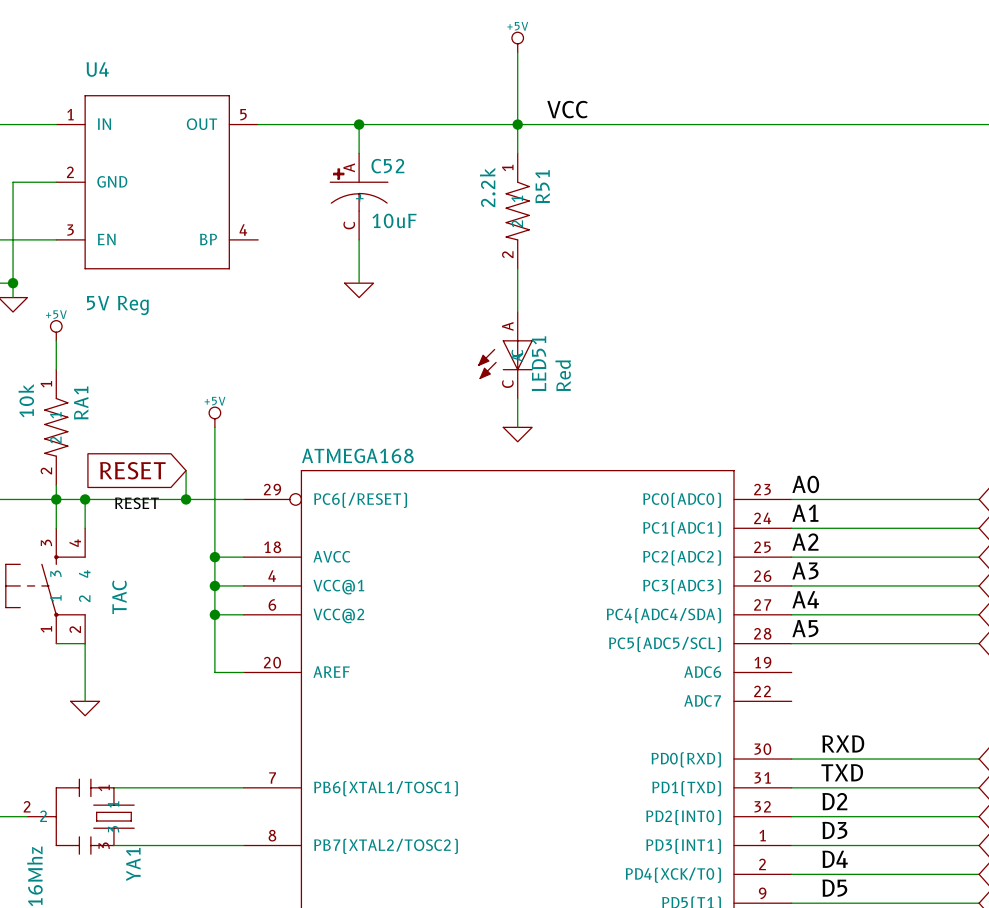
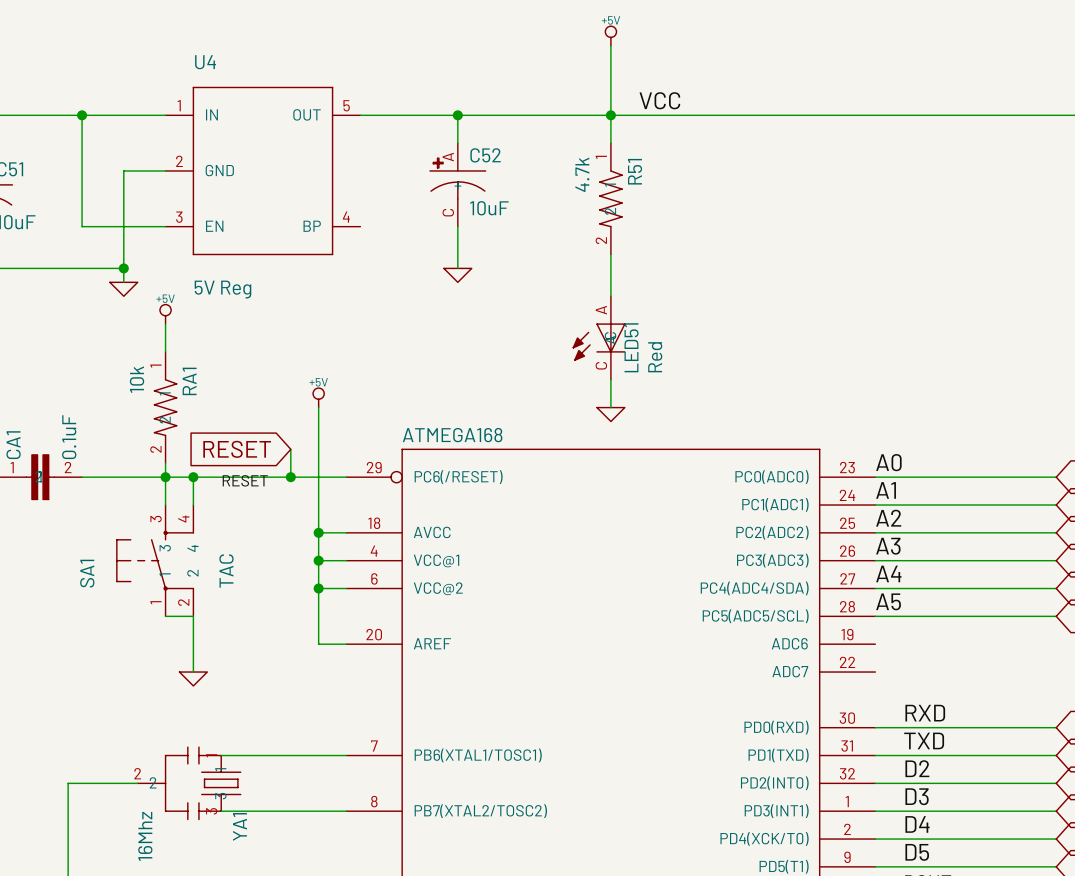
R51 value: 2.2k (487, 187) -> 4.7k (582, 174)

